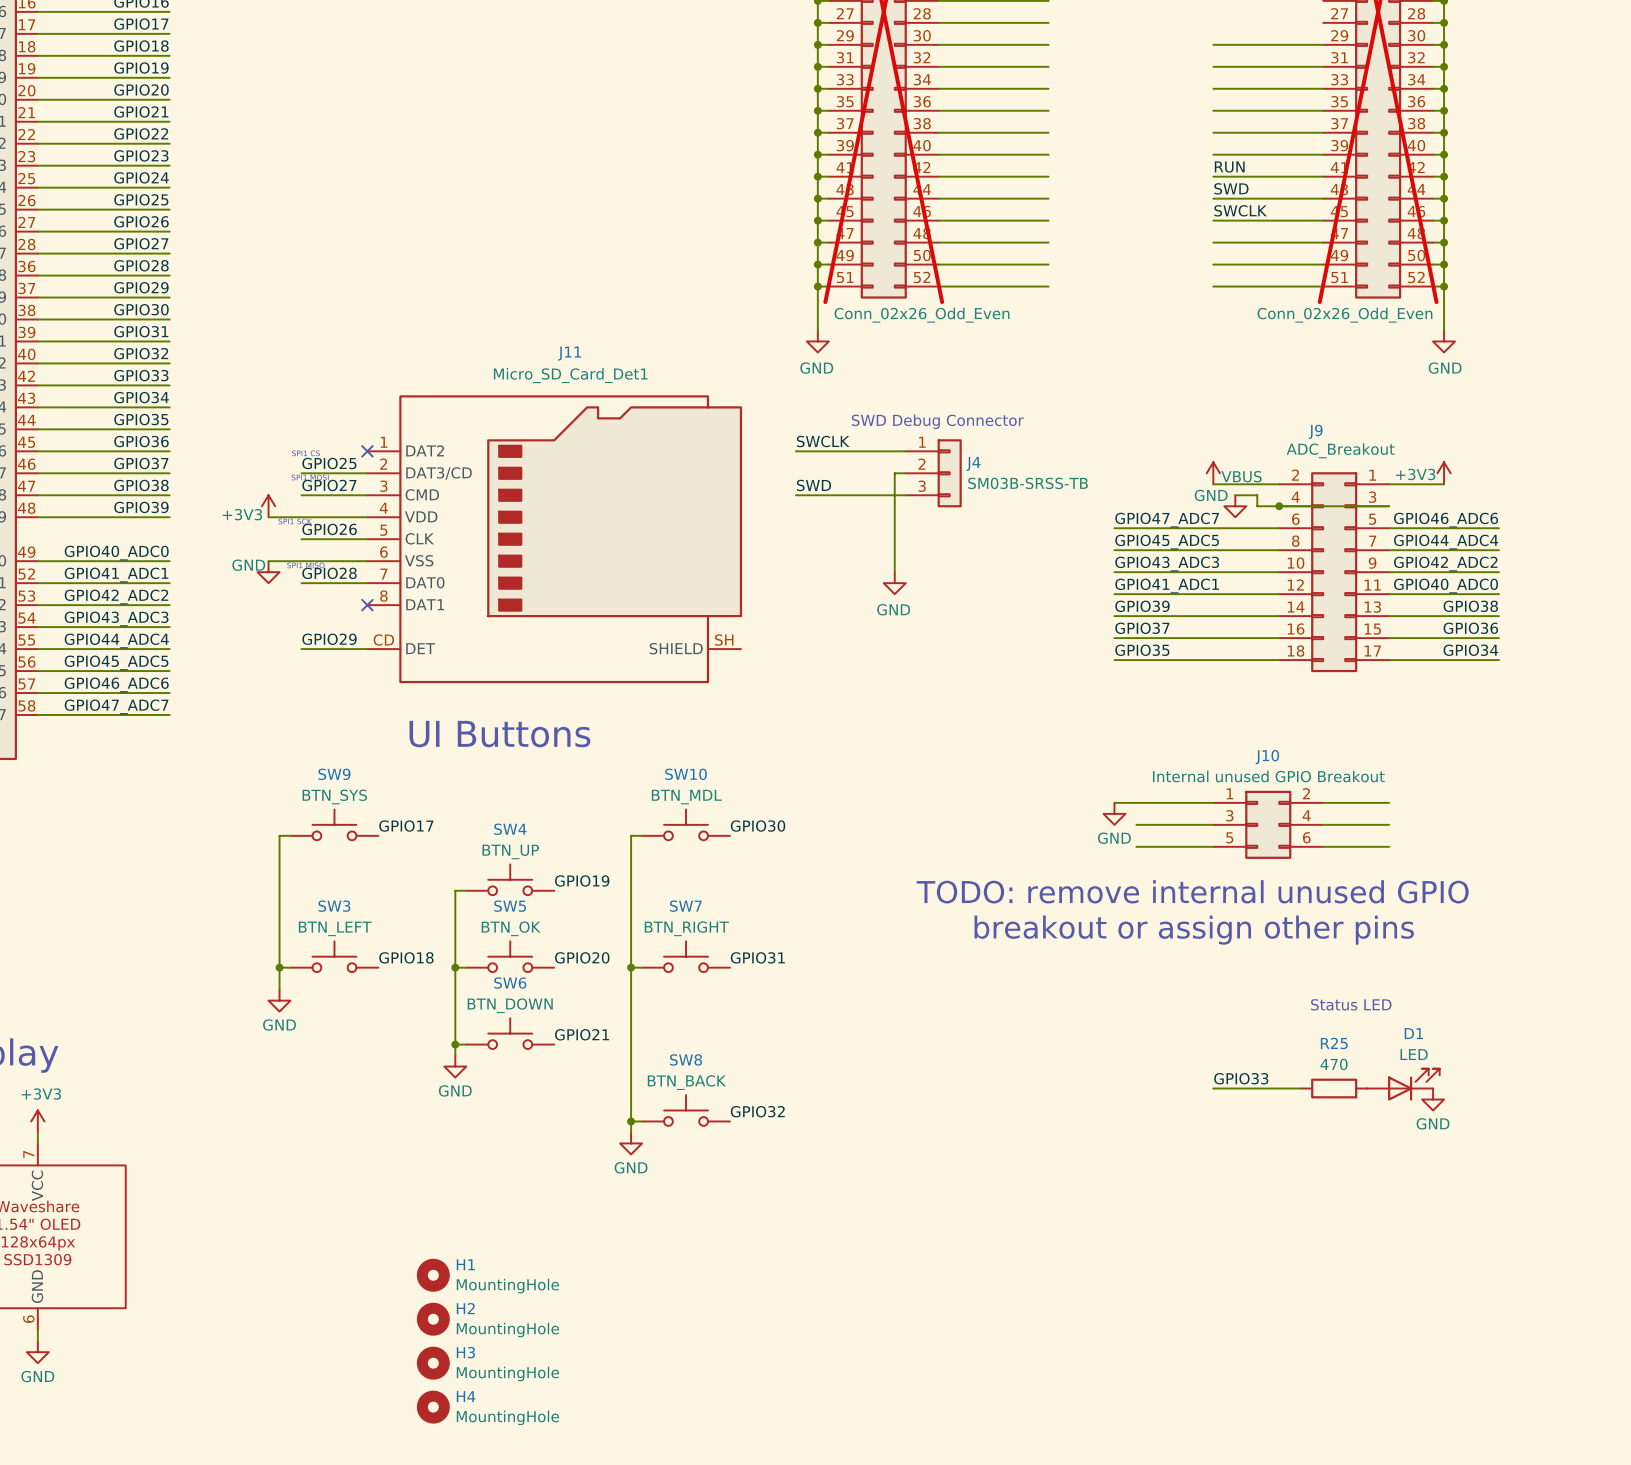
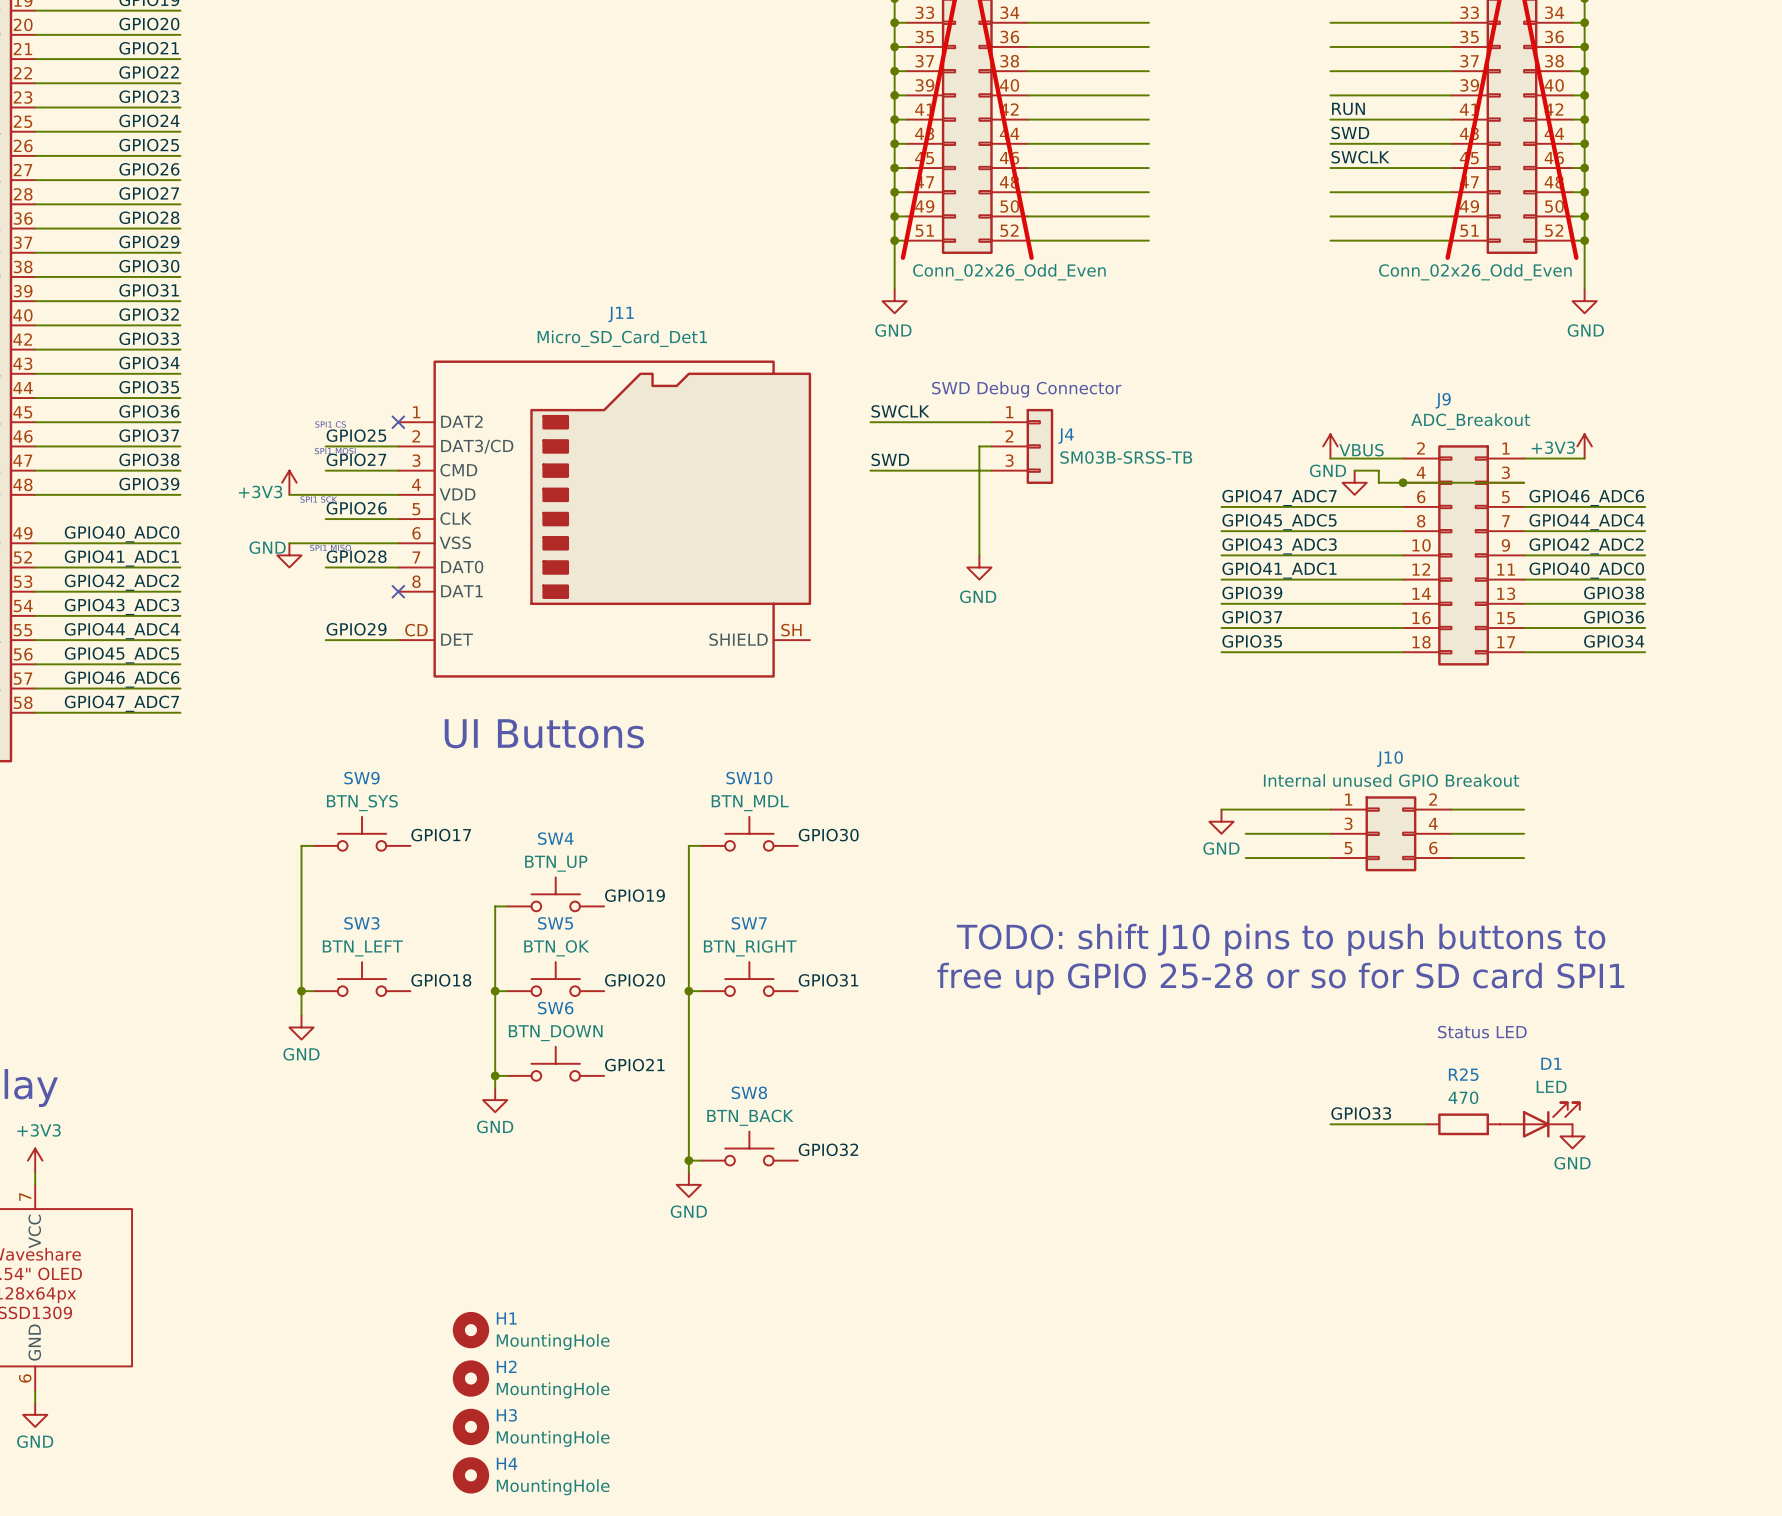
text: TODO: remove internal unused GPIO (1192, 891) -> none
text: none -> TODO: shift J10 pins to push buttons to (1281, 939)
text: breakout or assign other pins (1194, 930) -> none
text: none -> free up GPIO 25-28 or so for SD card SPI1 (1280, 978)

